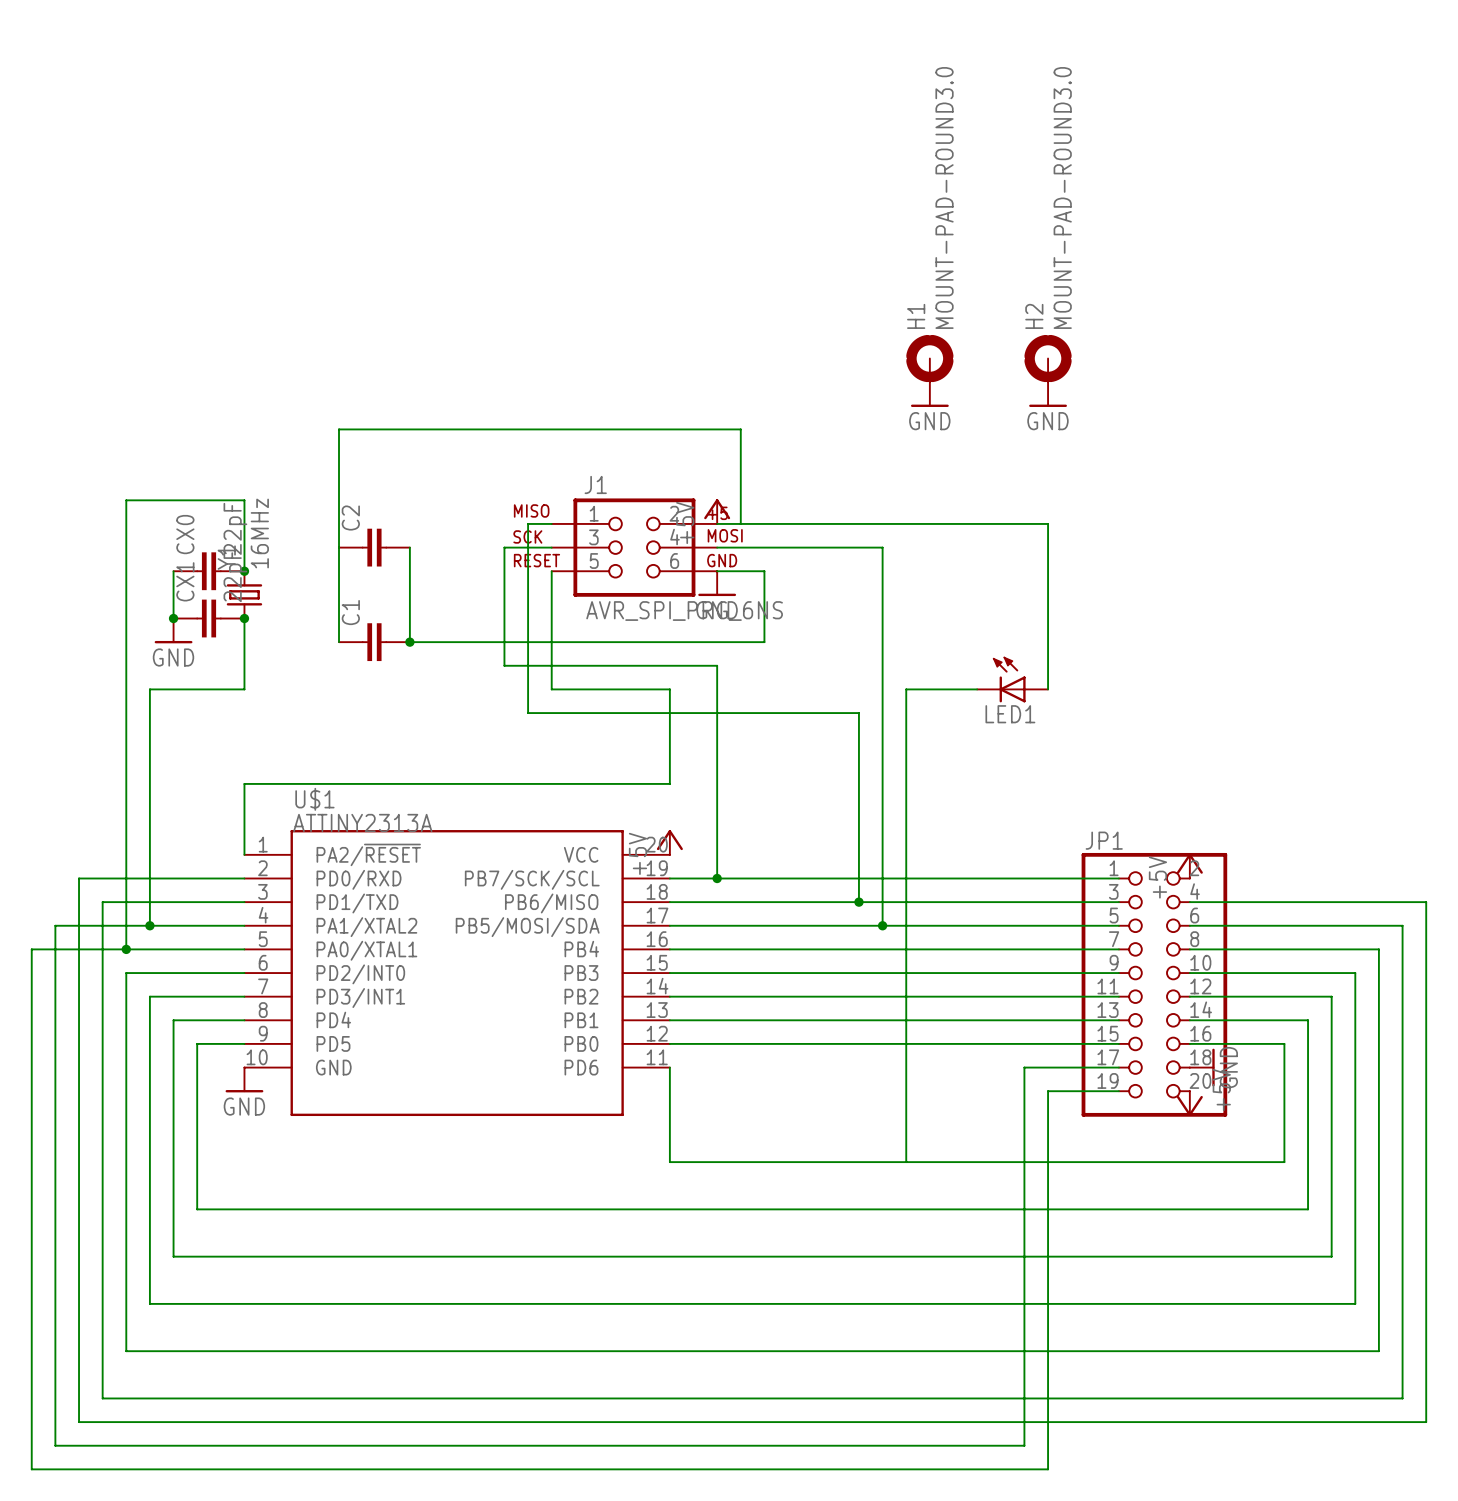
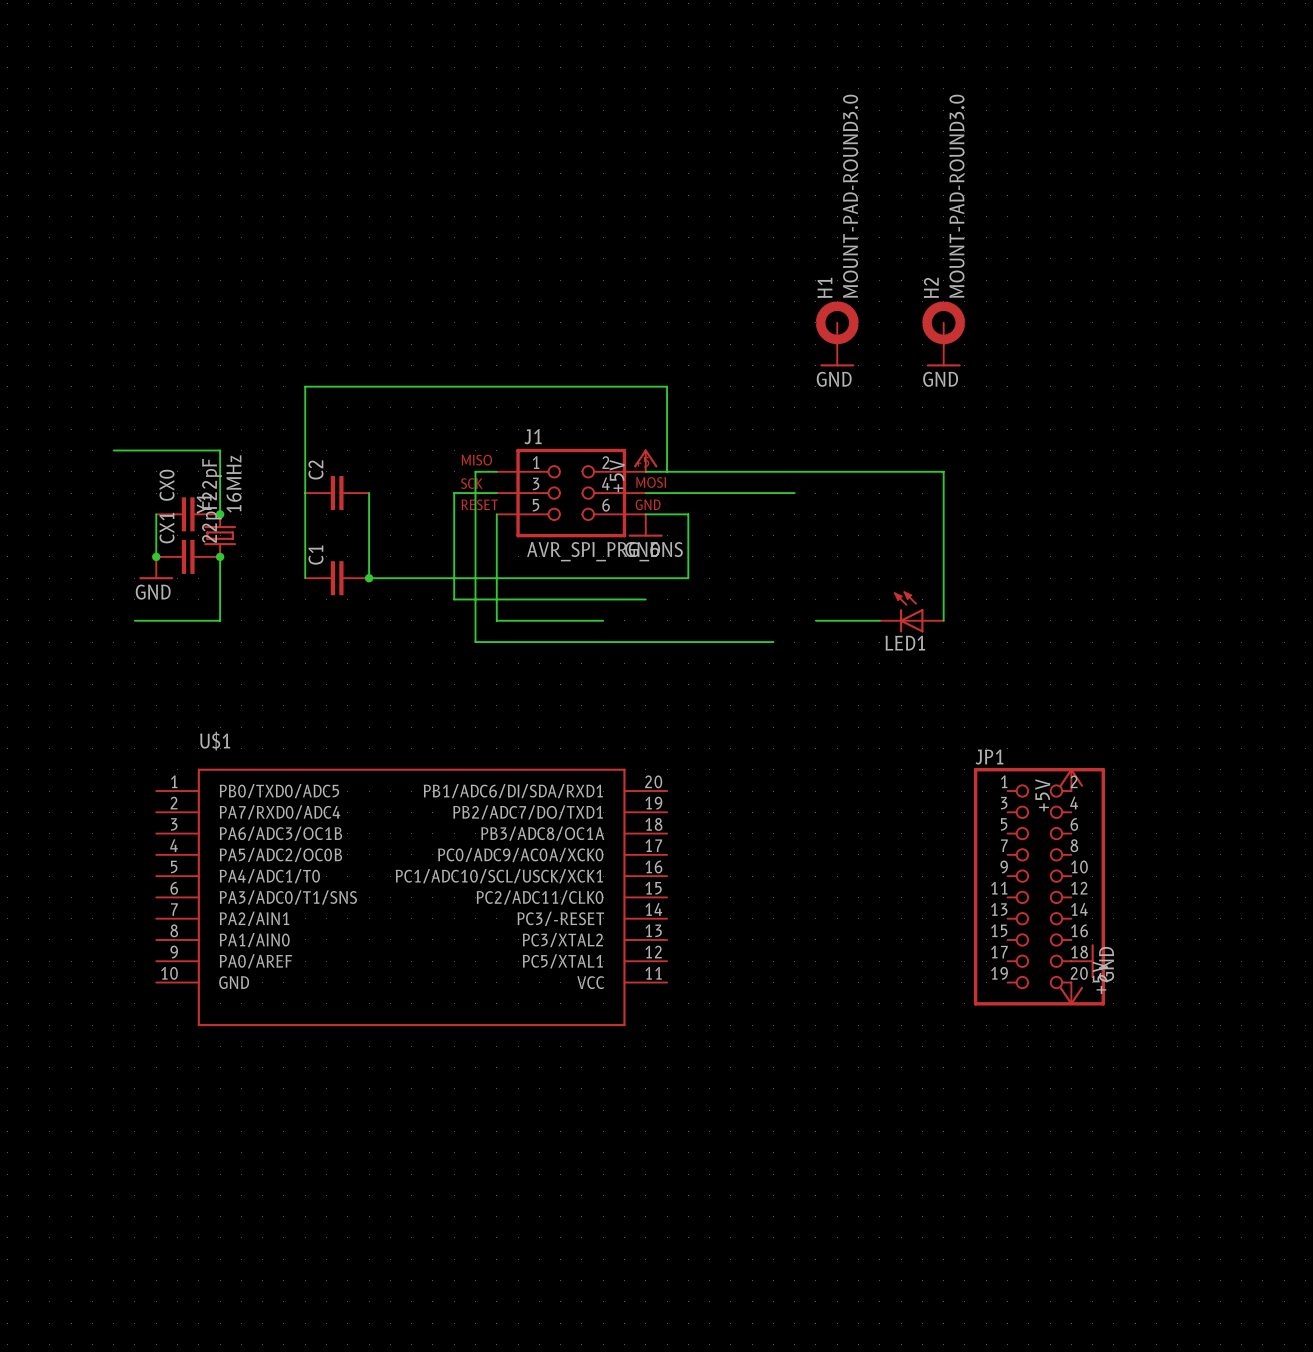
wire: (126, 500) (126, 949) -> none
wire: (882, 547) (882, 925) -> none
wire: (717, 665) (717, 878) -> none
wire: (149, 689) (149, 925) -> none
wire: (669, 689) (669, 783) (244, 783) (244, 854) -> none
wire: (906, 689) (906, 1162) -> none
wire: (858, 713) (858, 902) -> none
U$1 name position: U$1 (314, 799) -> U$1 (215, 740)
U$1 value: ATTINY2313A (362, 822) -> none
U$1 symbol: [244, 830, 670, 1117] -> [156, 768, 668, 1027]
power symbol: +5V (669, 842) -> none
wire: (244, 878) (79, 878) (79, 1422) (1426, 1422) (1426, 902) (1189, 902) -> none
wire: (669, 878) (1118, 878) -> none
junction: (717, 878) -> none
wire: (244, 902) (102, 902) (102, 1398) (1402, 1398) (1402, 925) (1189, 925) -> none
wire: (669, 902) (1118, 902) -> none
junction: (858, 902) -> none
junction: (149, 925) -> none
wire: (244, 925) (55, 925) (55, 1445) (1024, 1445) (1024, 1067) (1118, 1067) -> none
wire: (669, 925) (1118, 925) -> none
junction: (882, 925) -> none
junction: (126, 949) -> none
wire: (244, 949) (31, 949) (31, 1469) (1048, 1469) (1048, 1091) (1118, 1091) -> none
wire: (669, 949) (1118, 949) -> none
wire: (1189, 949) (1378, 949) (1378, 1351) (126, 1351) (126, 973) (244, 973) -> none
wire: (669, 973) (1118, 973) -> none
wire: (1189, 973) (1355, 973) (1355, 1303) (149, 1303) (149, 996) (244, 996) -> none
wire: (669, 996) (1118, 996) -> none
wire: (1189, 996) (1331, 996) (1331, 1256) (173, 1256) (173, 1020) (244, 1020) -> none
wire: (669, 1020) (1118, 1020) -> none
wire: (1189, 1020) (1308, 1020) (1308, 1209) (197, 1209) (197, 1043) (244, 1043) -> none
wire: (669, 1043) (1118, 1043) -> none
wire: (1189, 1043) (1284, 1043) (1284, 1162) (669, 1162) (669, 1067) -> none
power symbol: GND (244, 1079) -> none

